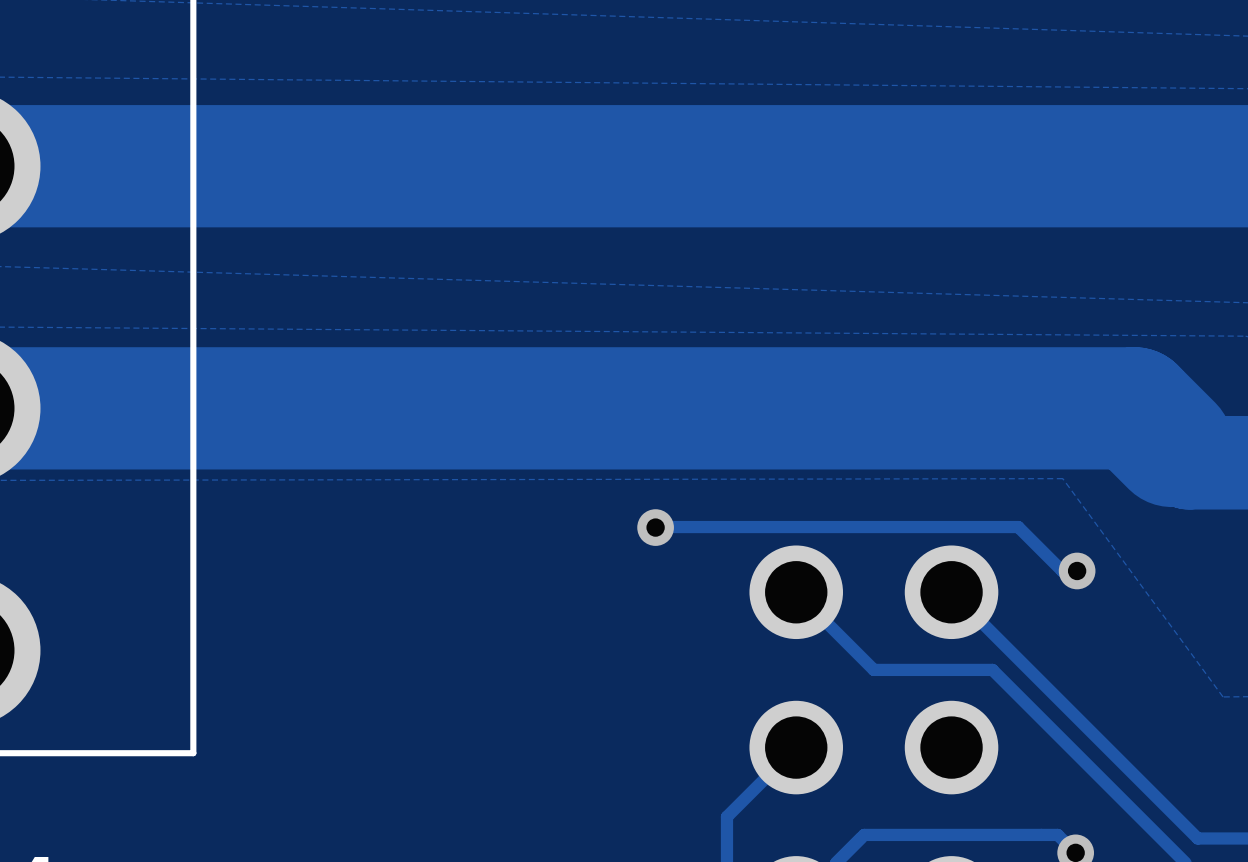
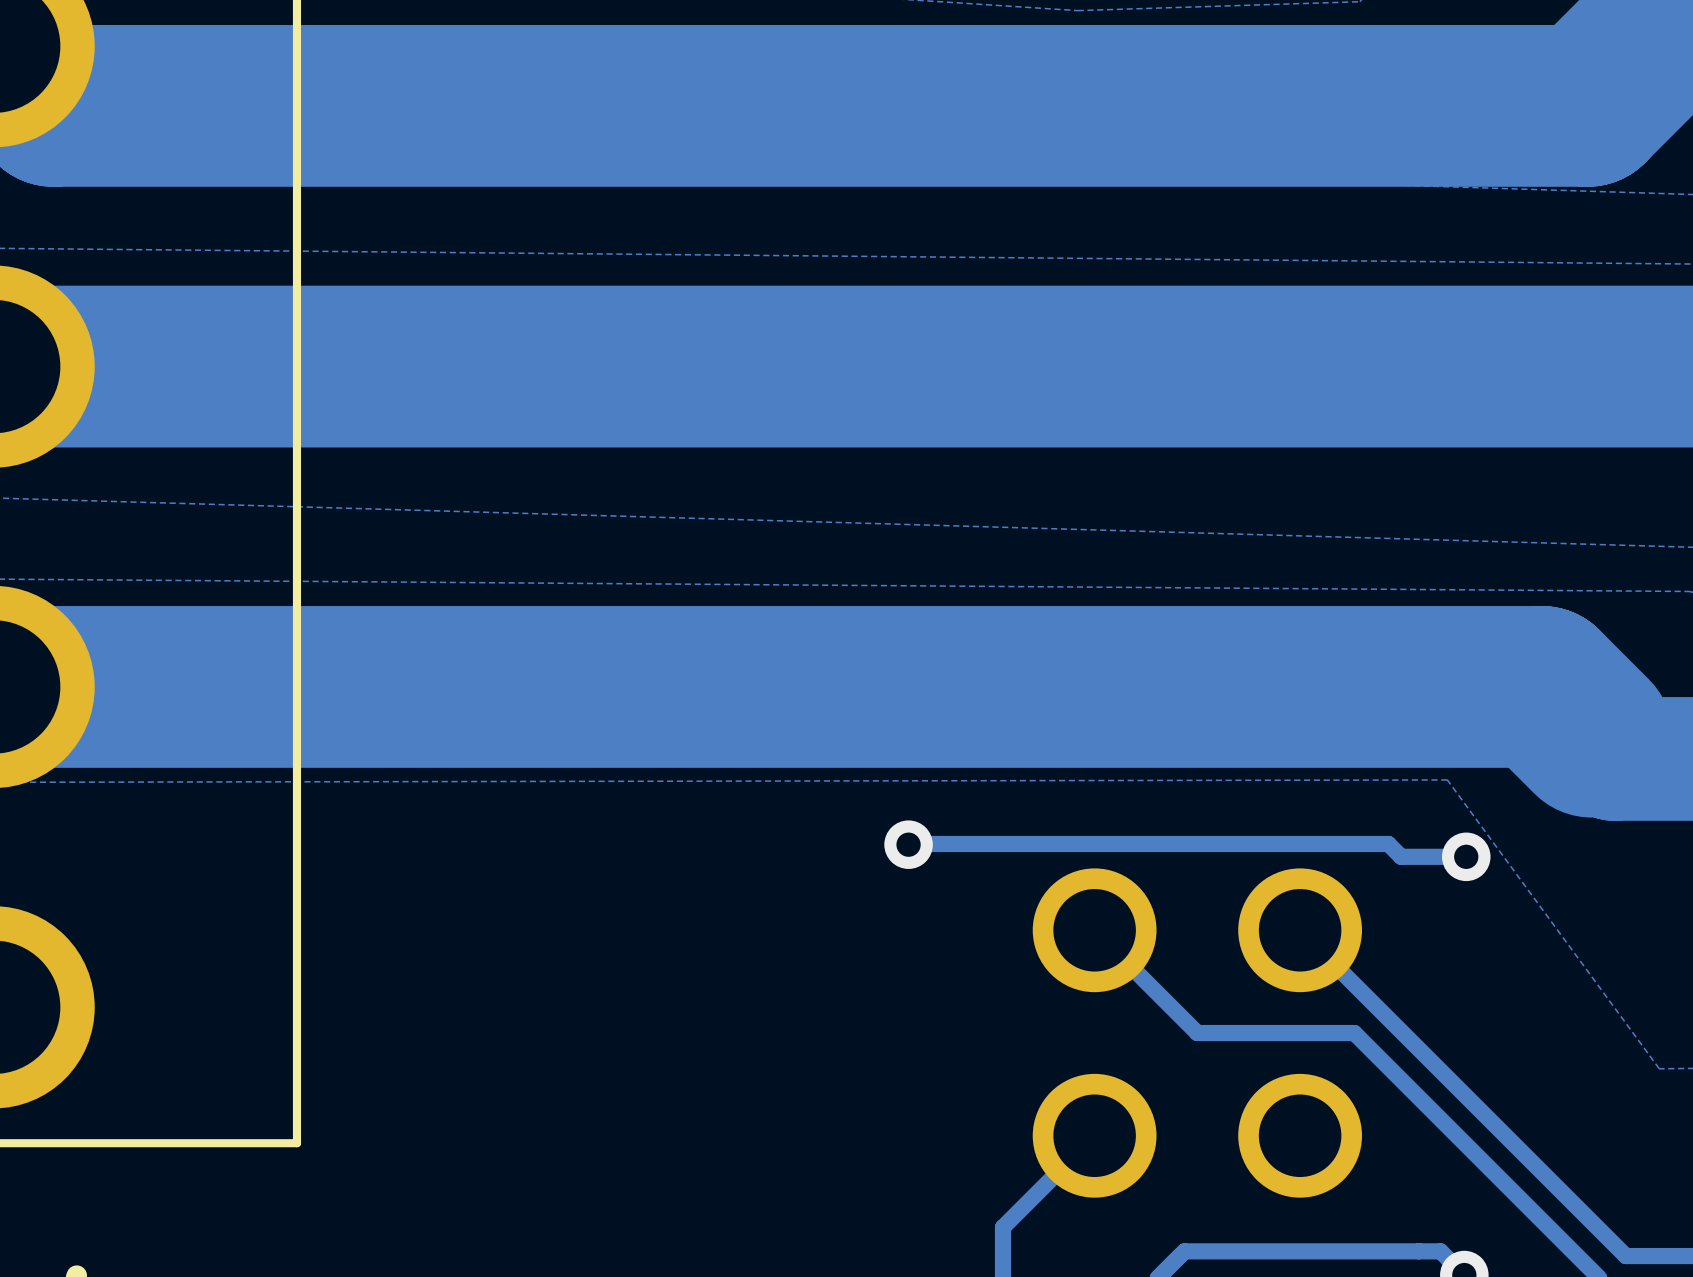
track: (1027, 536) (1062, 570) (1077, 570) -> (1401, 856) (1466, 856)
via position: (1077, 570) -> (1466, 856)

